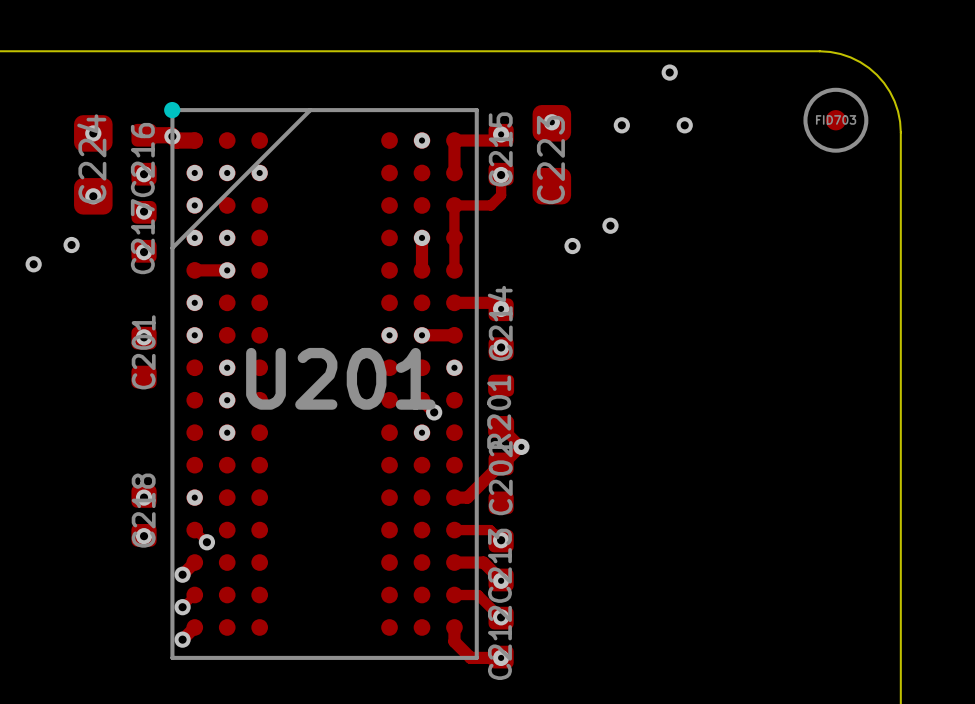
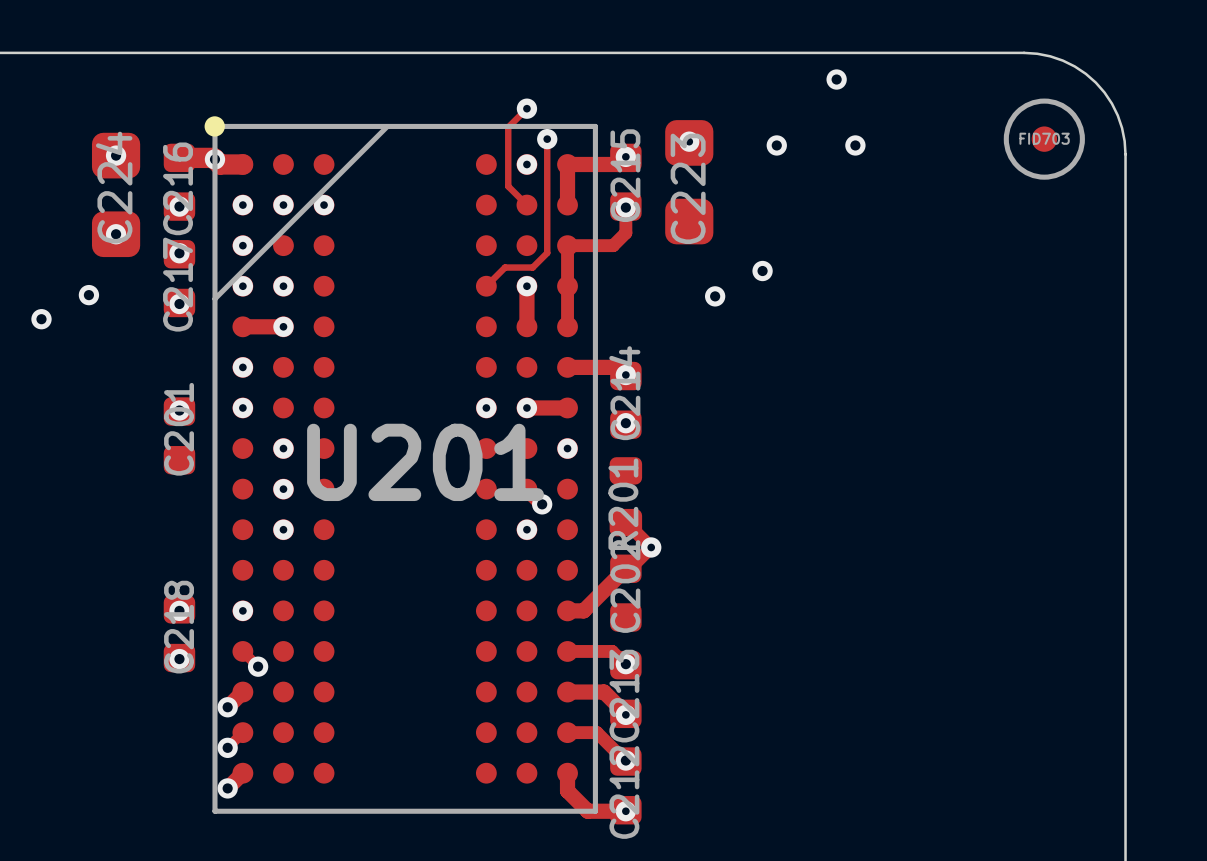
track: none -> (526, 108) (508, 127) (508, 186) (526, 205)
via: none -> (526, 108)
track: none -> (547, 139) (547, 253) (532, 267) (505, 267) (486, 286)
via: none -> (547, 139)

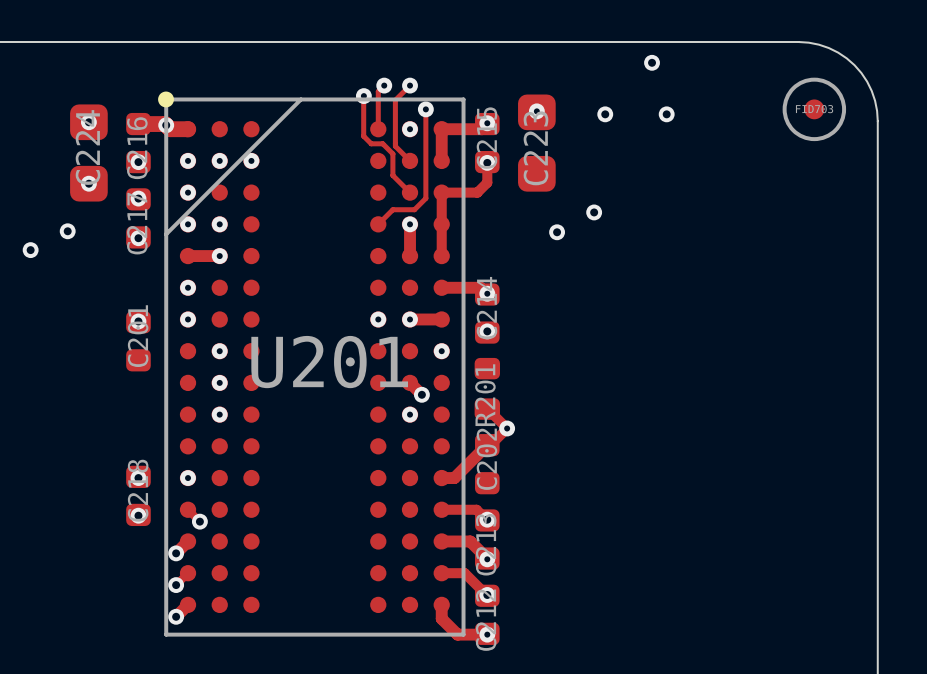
track: none -> (384, 85) (378, 91) (378, 129)
via: none -> (384, 85)
track: none -> (363, 96) (363, 136) (371, 143) (382, 143) (392, 153) (392, 175) (410, 192)
via: none -> (363, 96)

